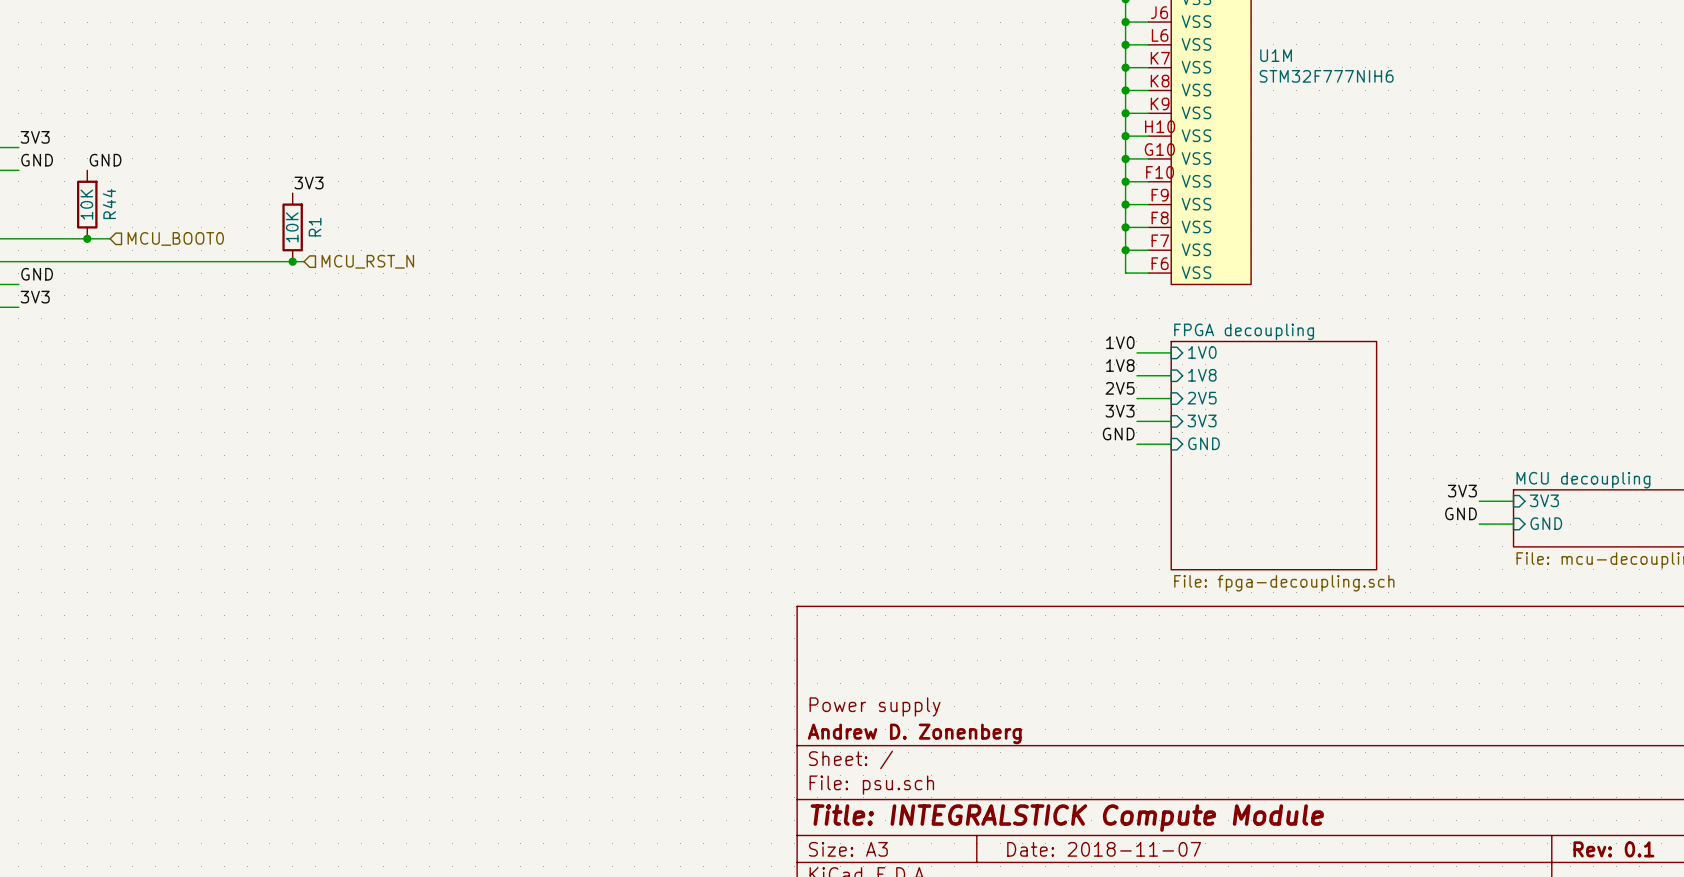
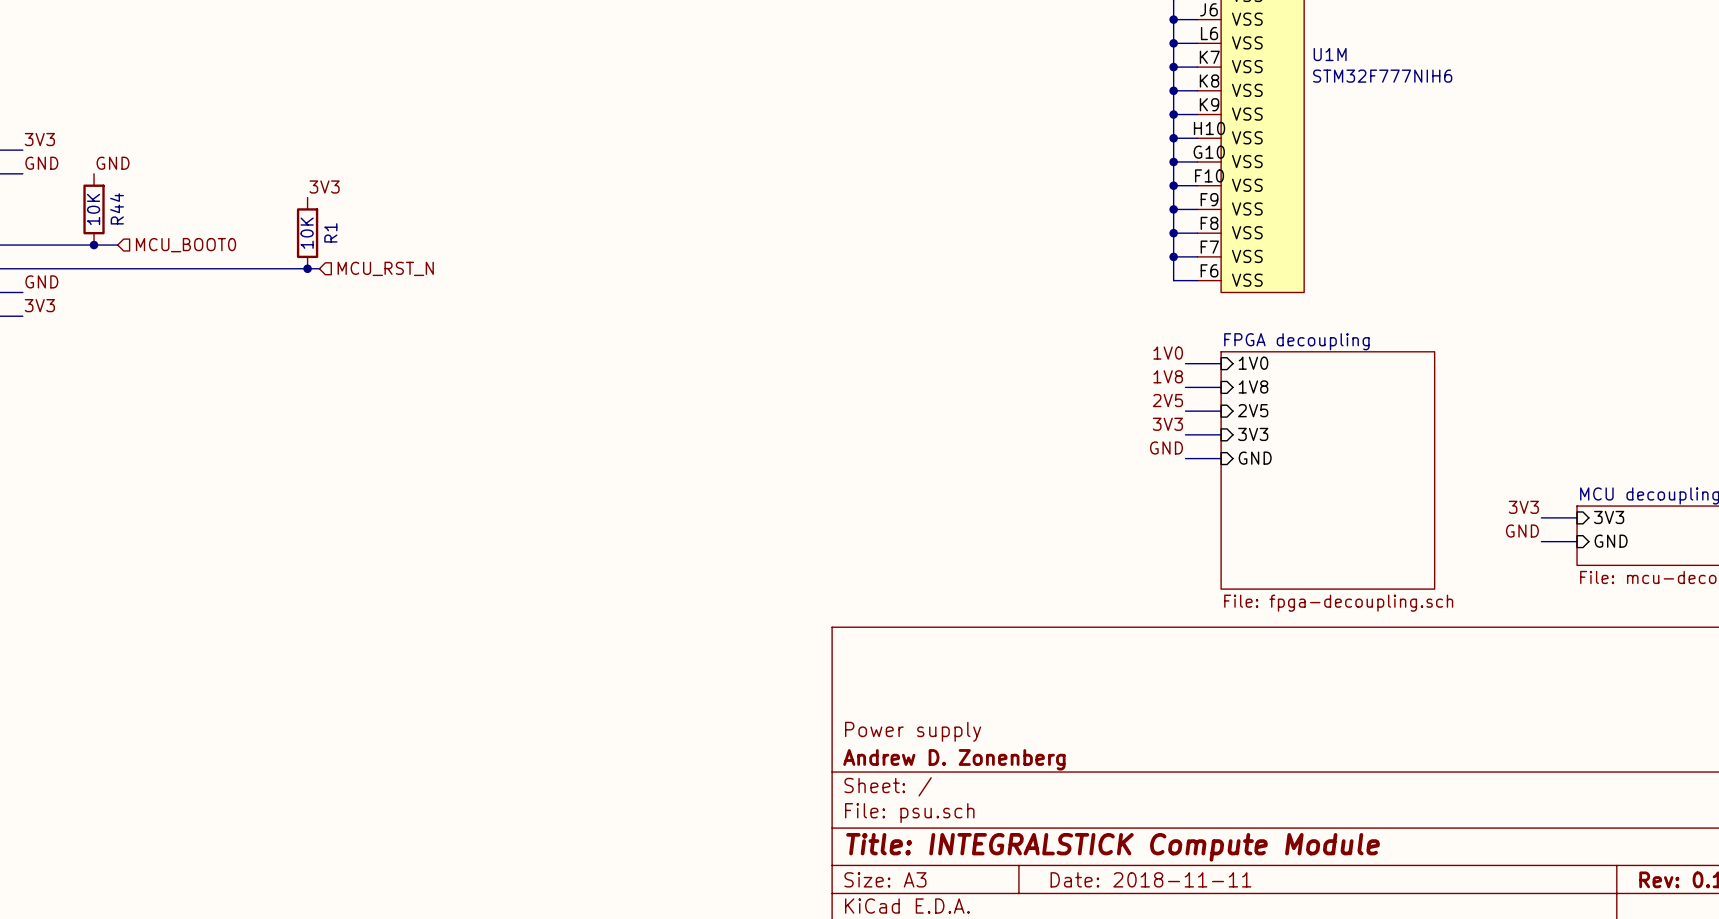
title block: Date: 2018-11-07 (1104, 849) -> Date: 2018-11-11 (1150, 879)

